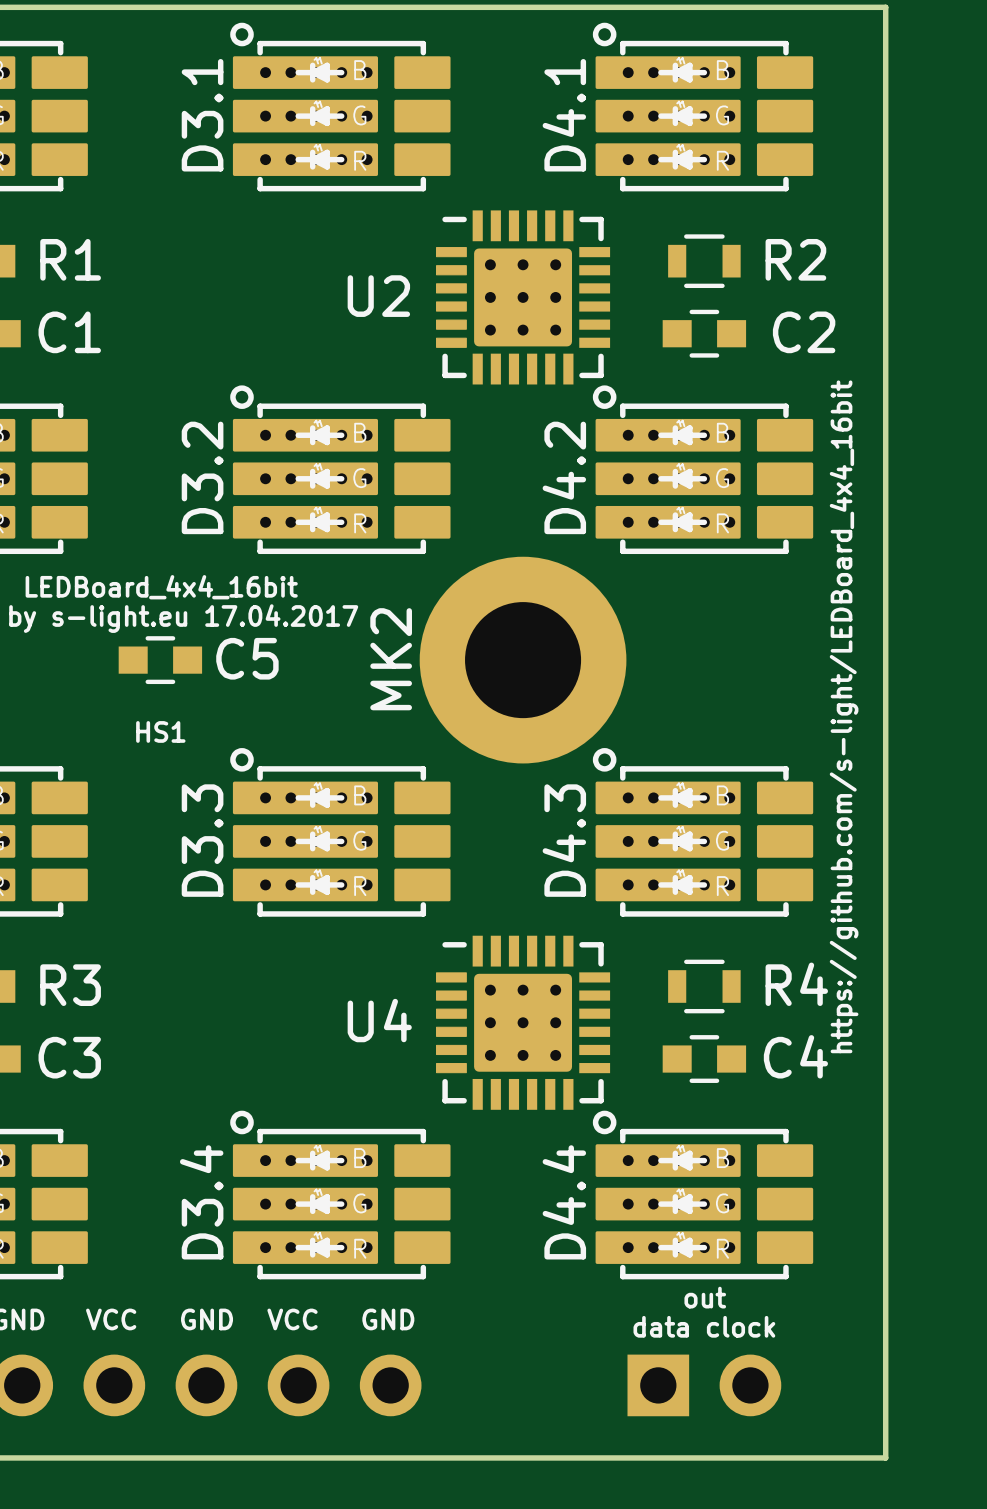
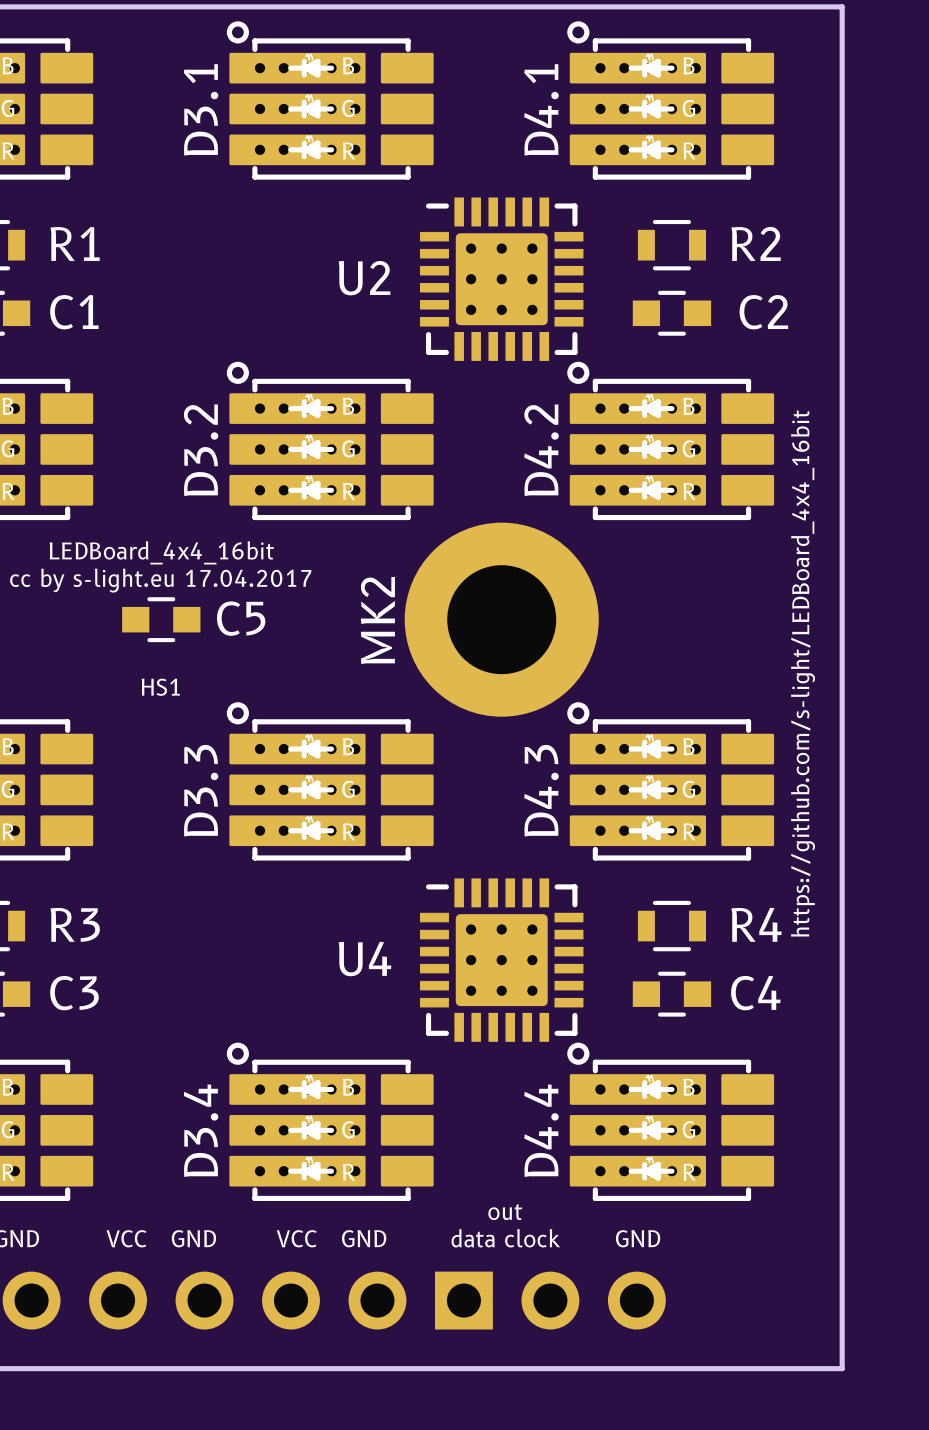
text position: out (705, 1297) -> out (505, 1211)
text: none -> GND (638, 1238)
text position: data clock (704, 1326) -> data clock (505, 1238)
part: none -> (550, 1300)
part: (704, 1385) -> none

